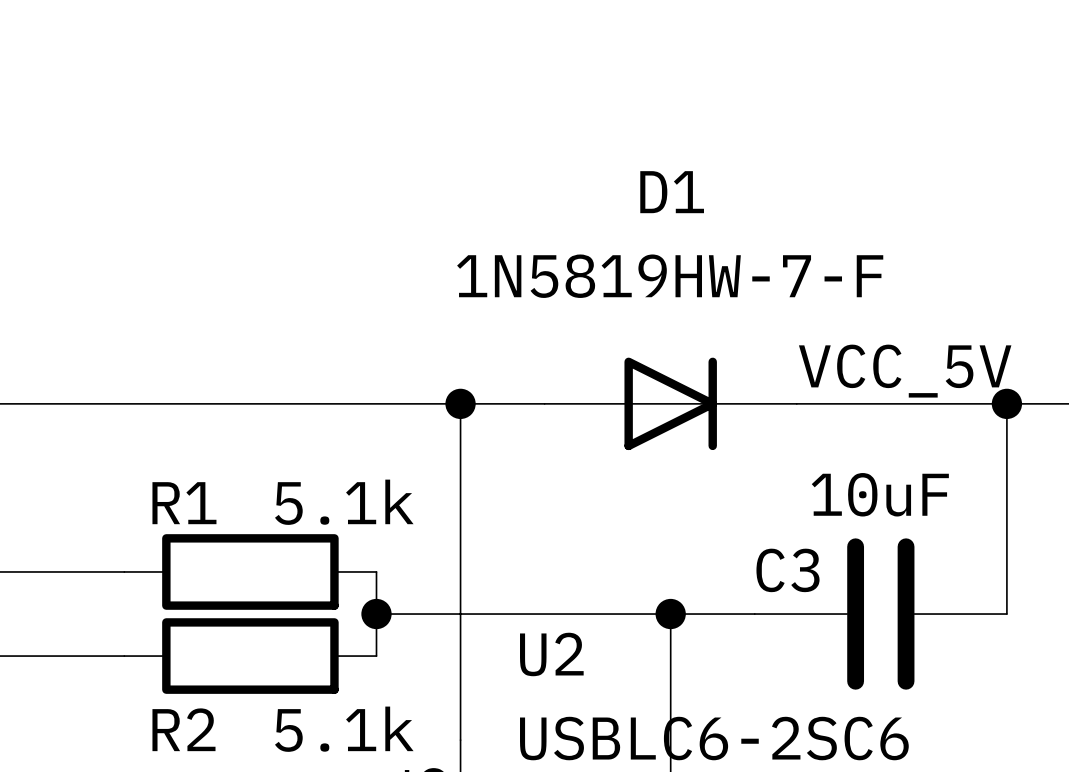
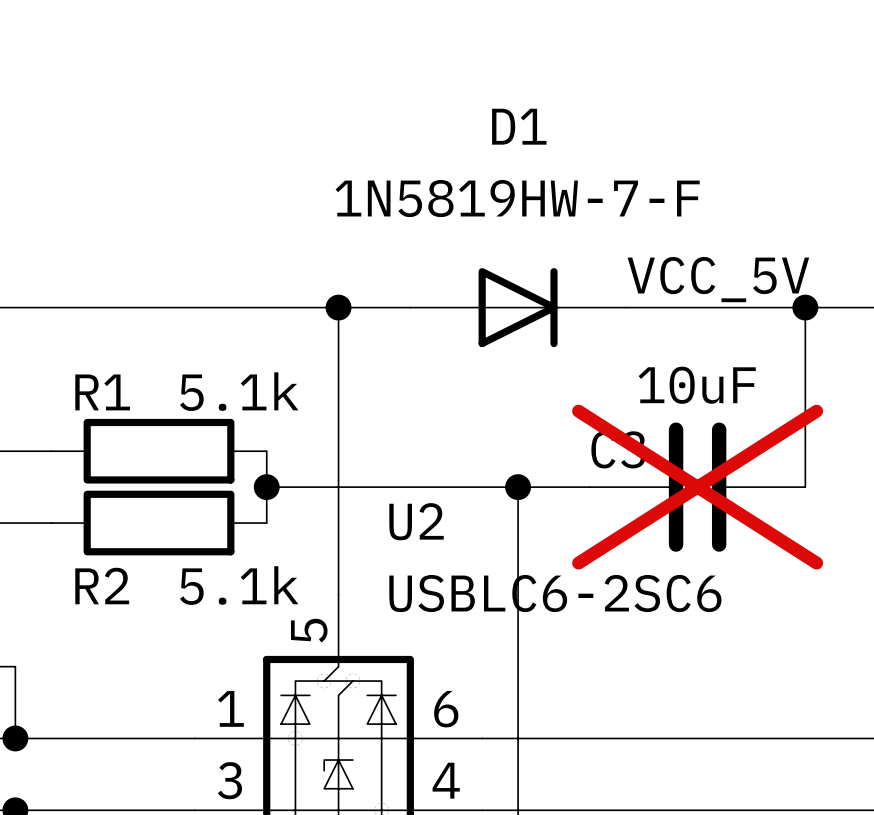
C3 do-not-place cross: none -> (697, 487)

